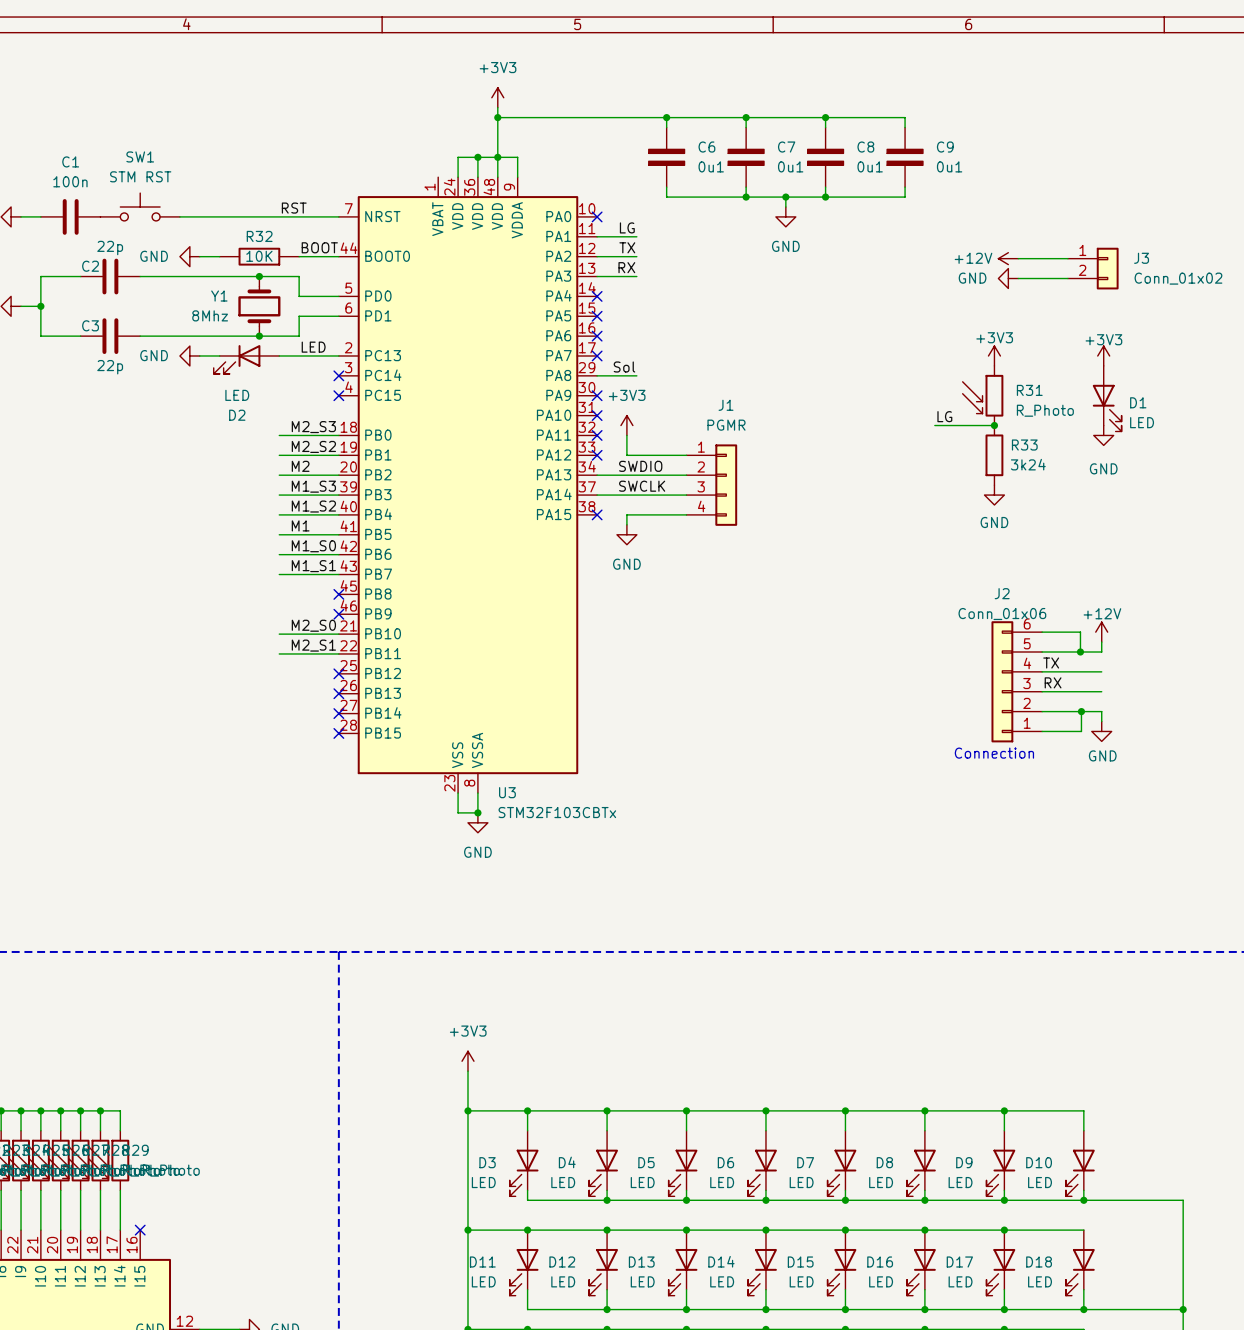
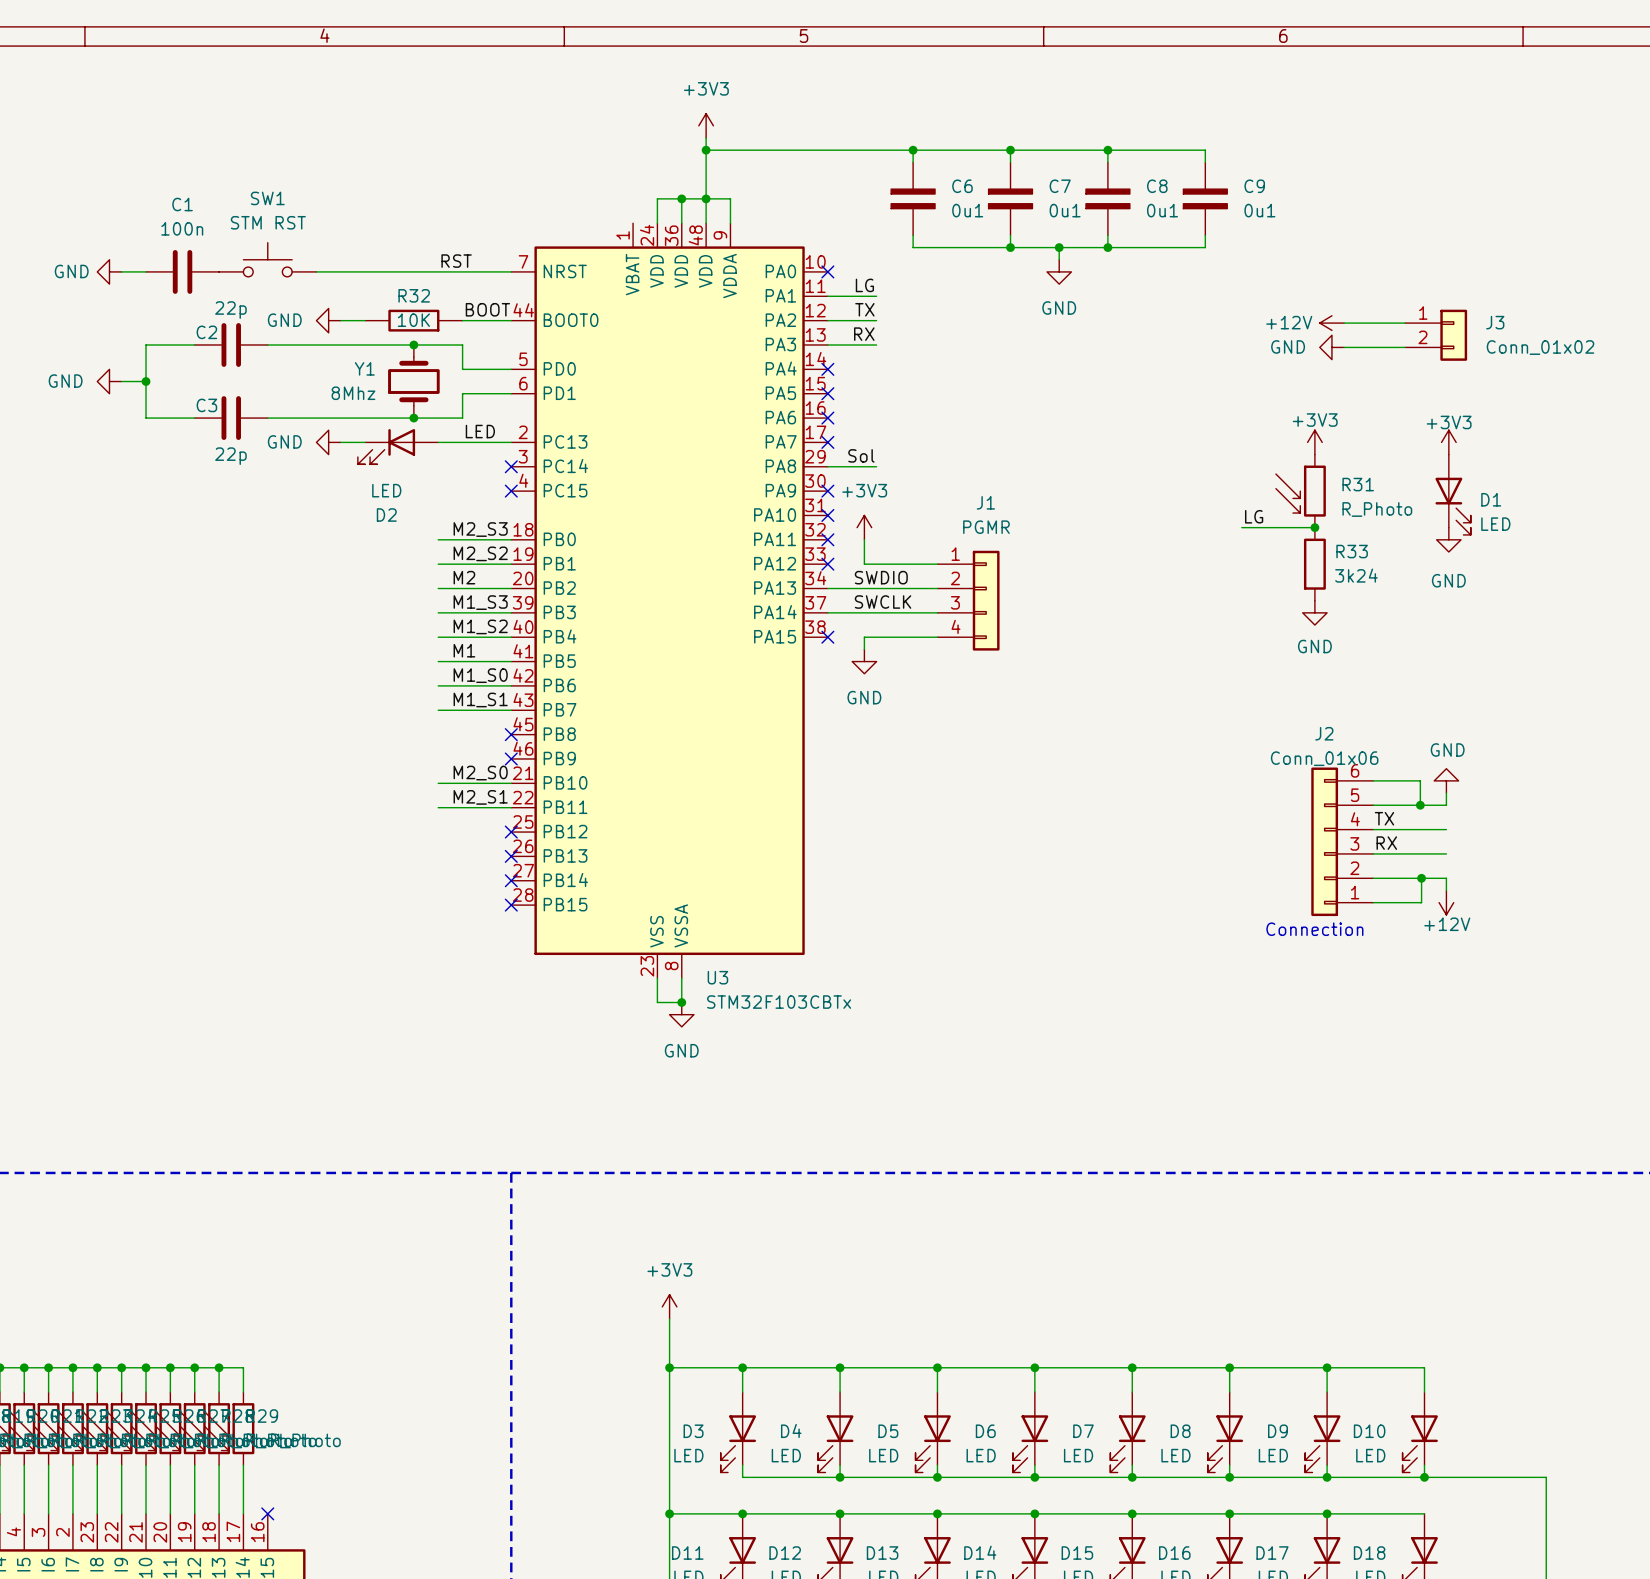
power symbol: +12V (1101, 632) -> GND (1446, 780)
power symbol: GND (1101, 731) -> +12V (1446, 902)

